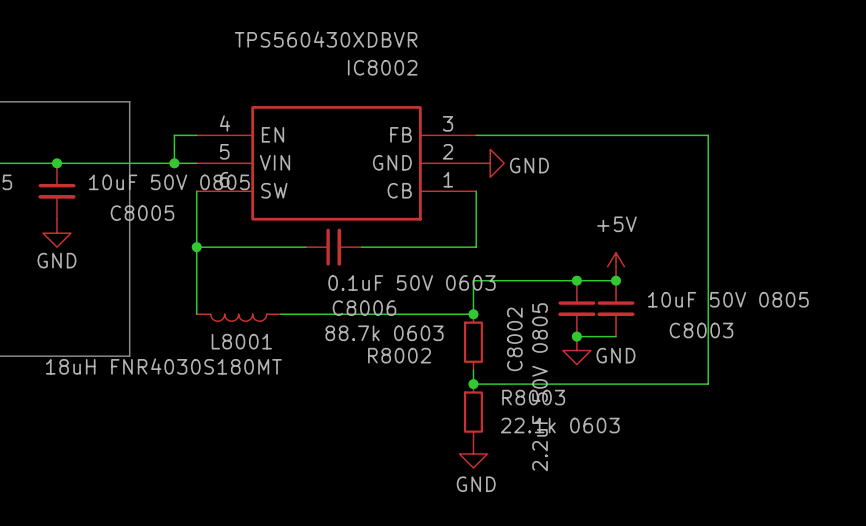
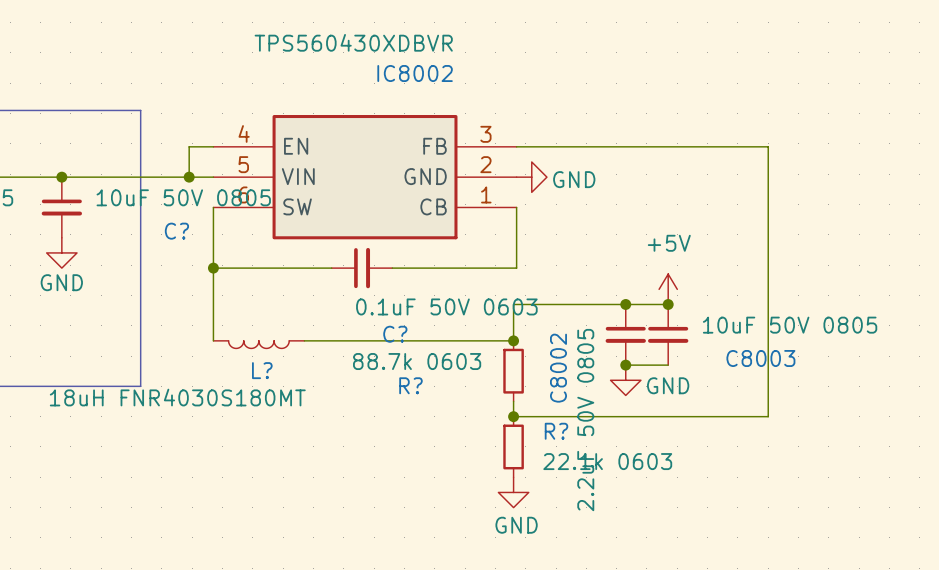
C8005 name: C8005 (142, 213) -> C? (176, 231)
C8006 name: C8006 (364, 308) -> C? (395, 334)
L8001 name: L8001 (241, 341) -> L? (262, 370)
R8002 name: R8002 (399, 355) -> R? (410, 385)
R8003 name: R8003 (533, 397) -> R? (556, 431)

